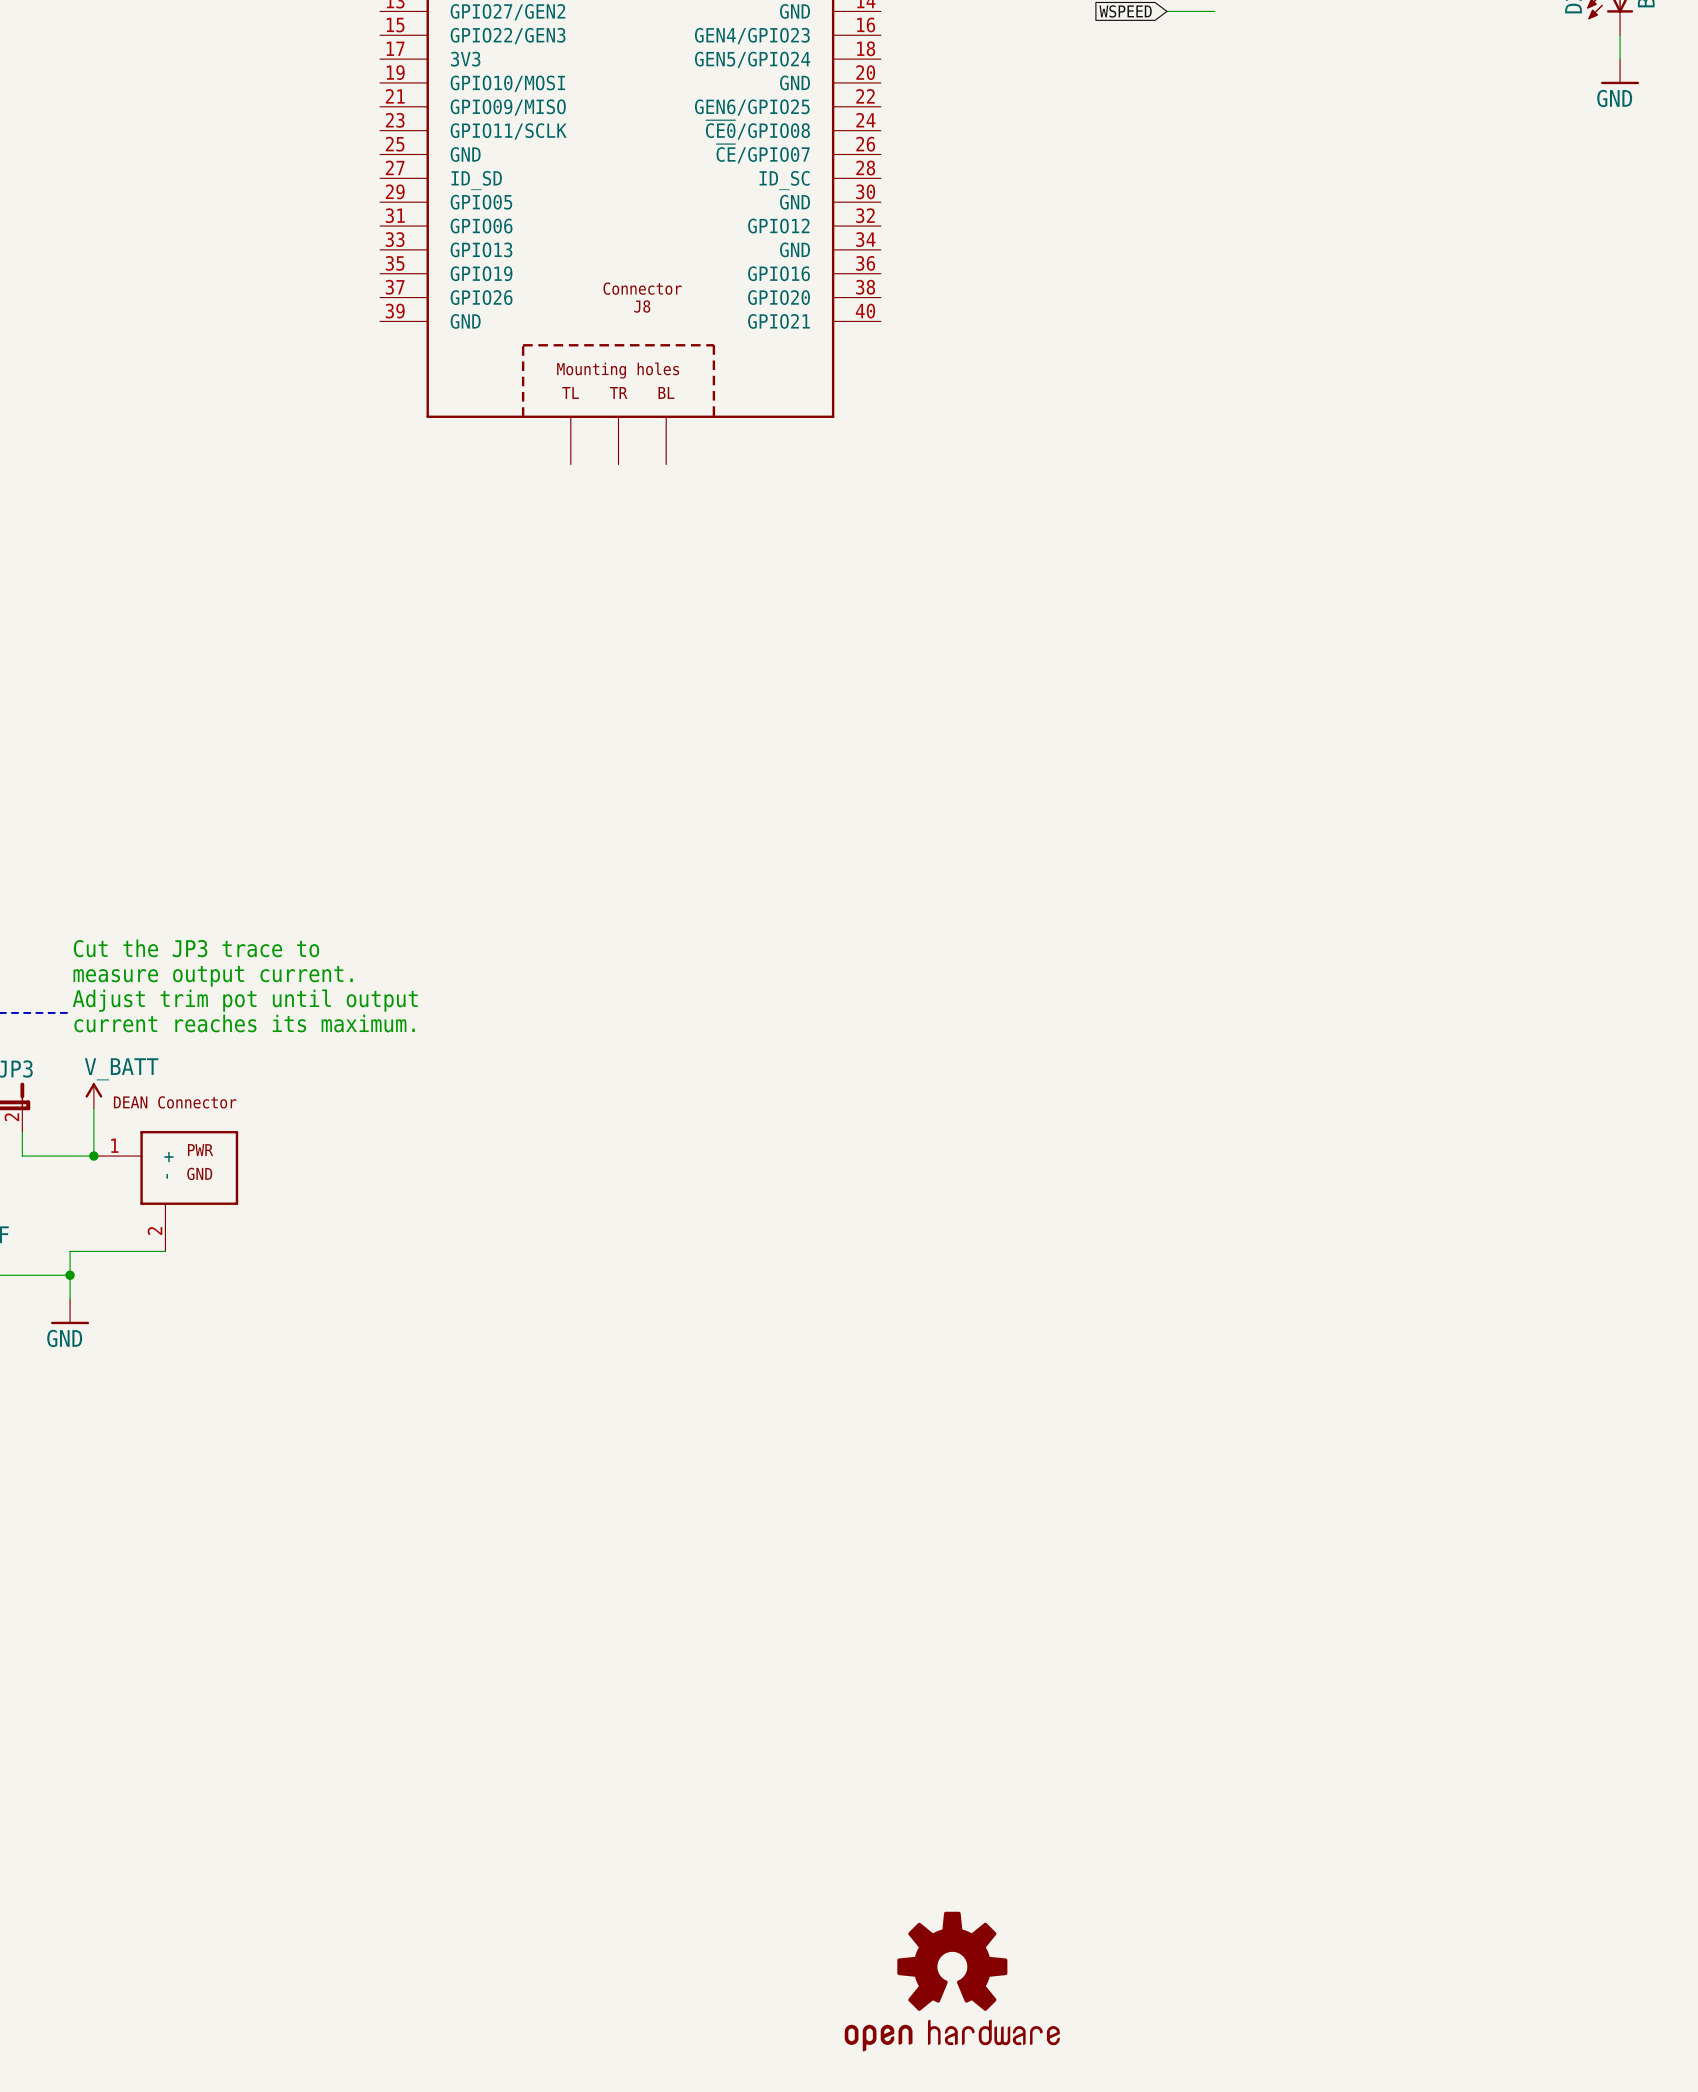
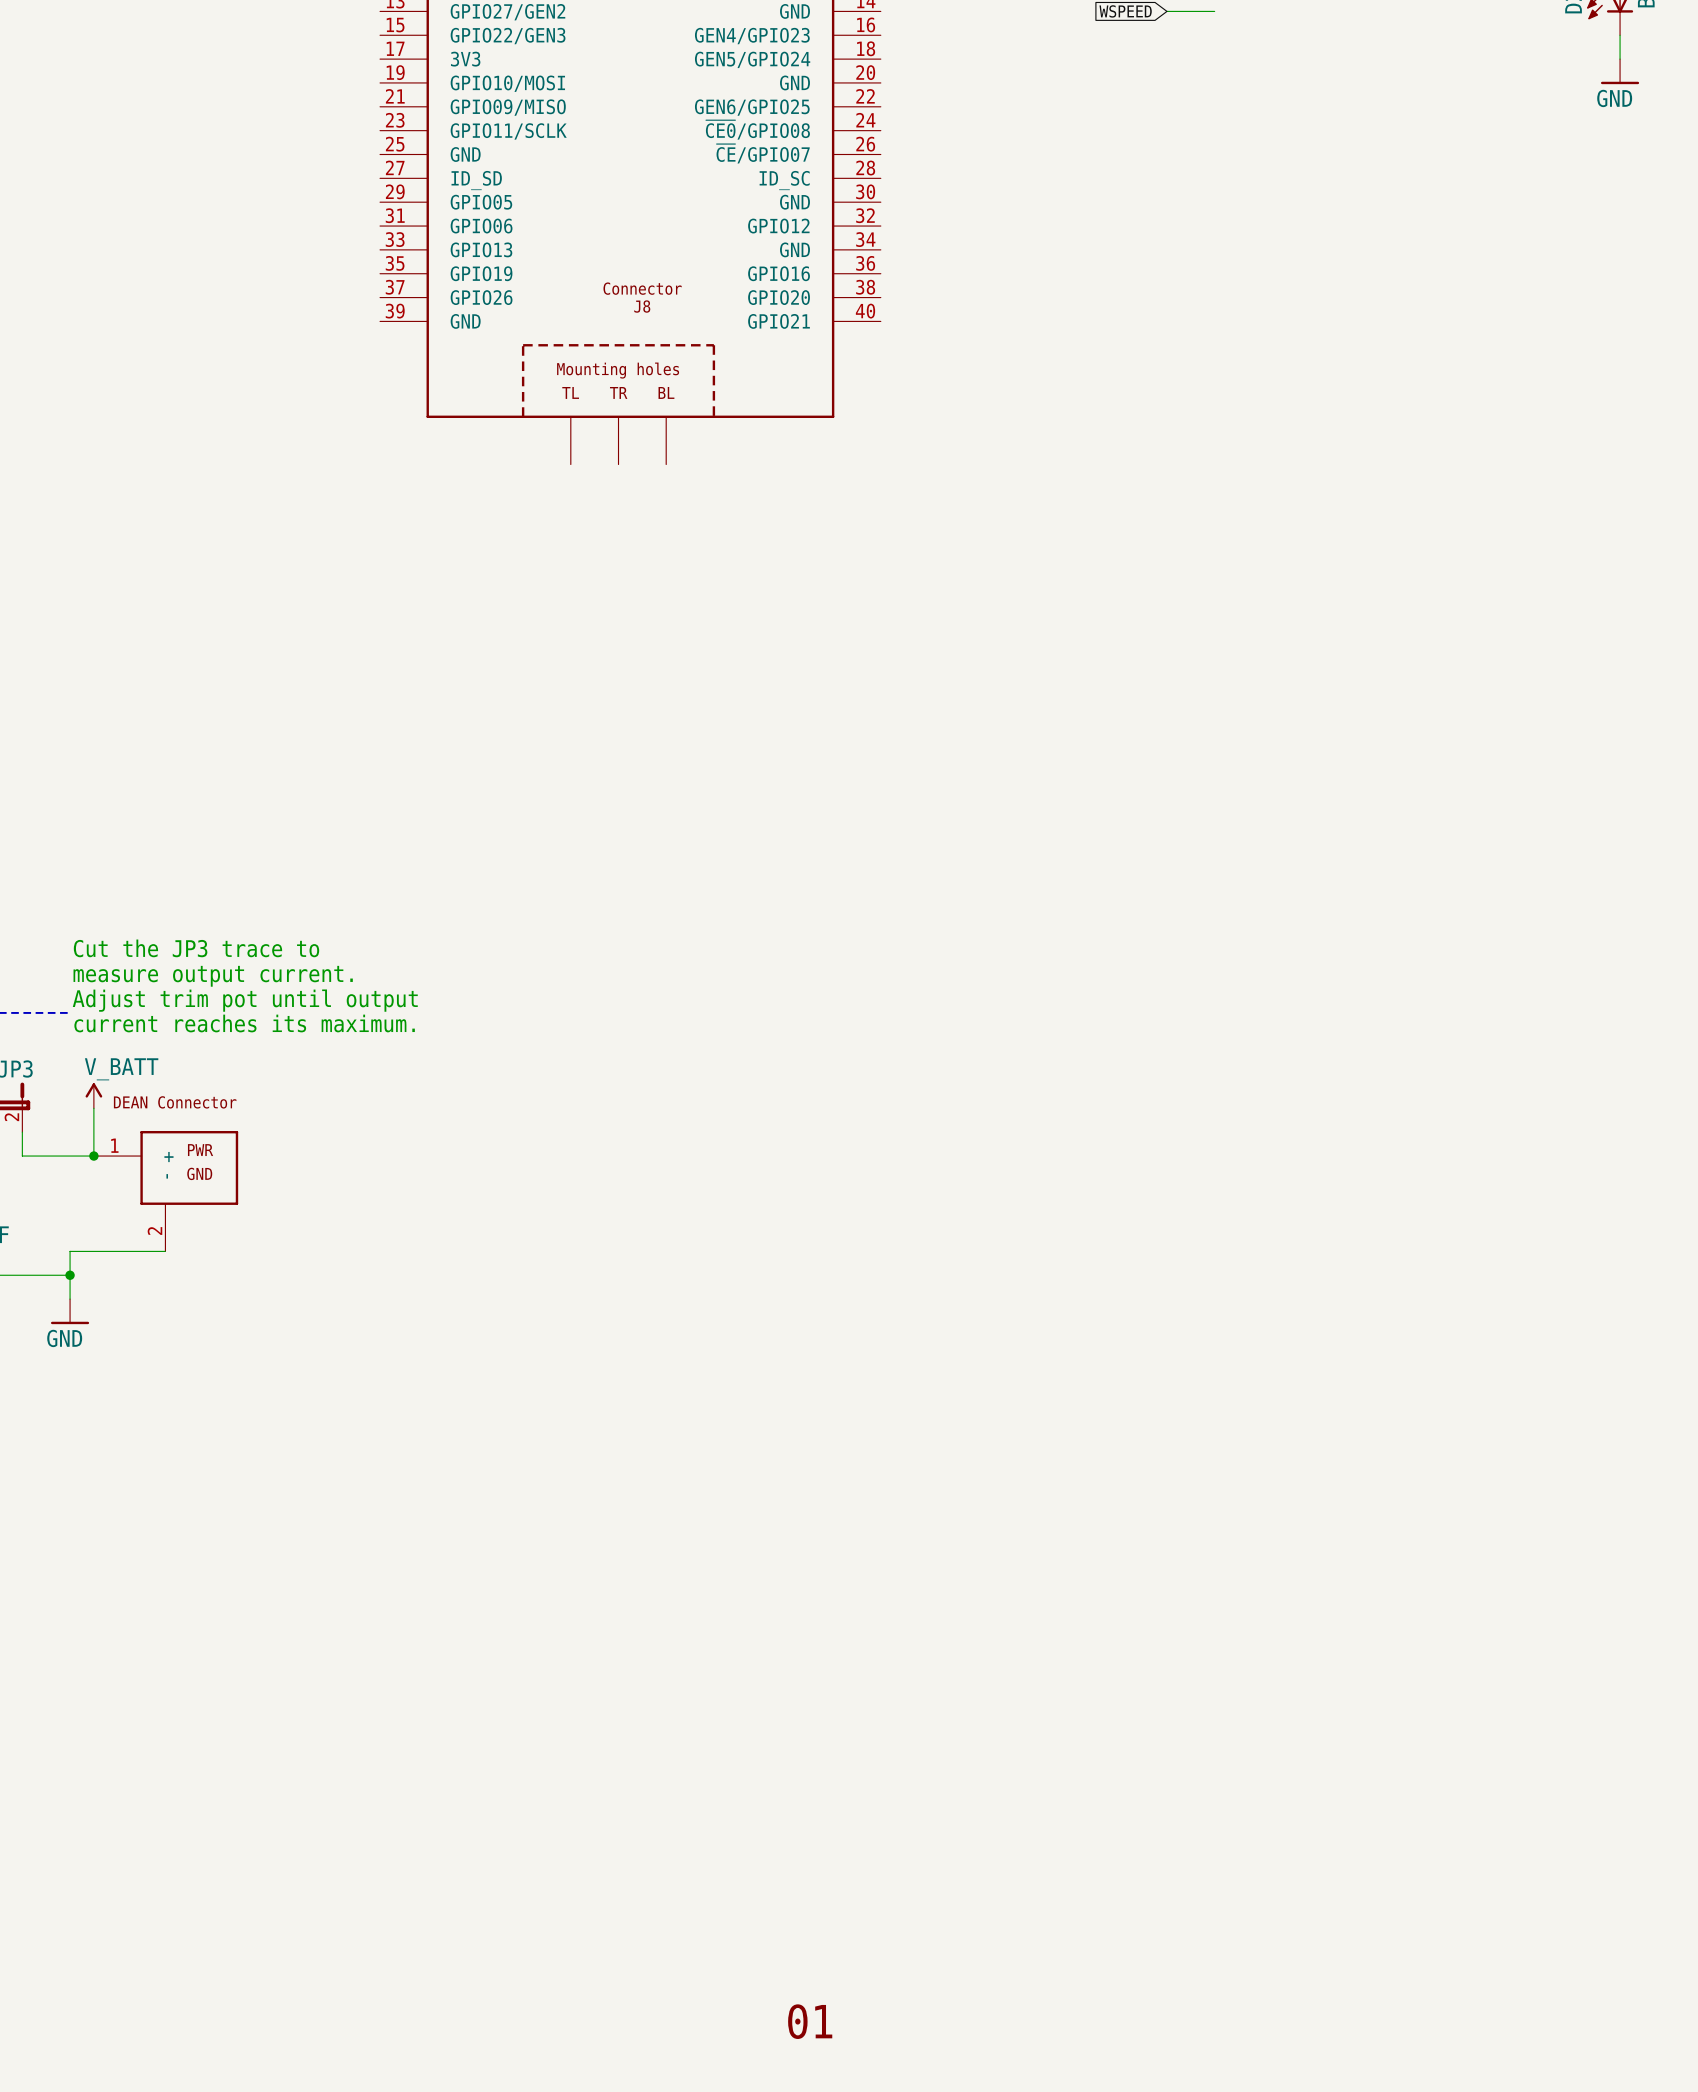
part: (952, 1981) -> none
text: none -> 01 (810, 2021)

